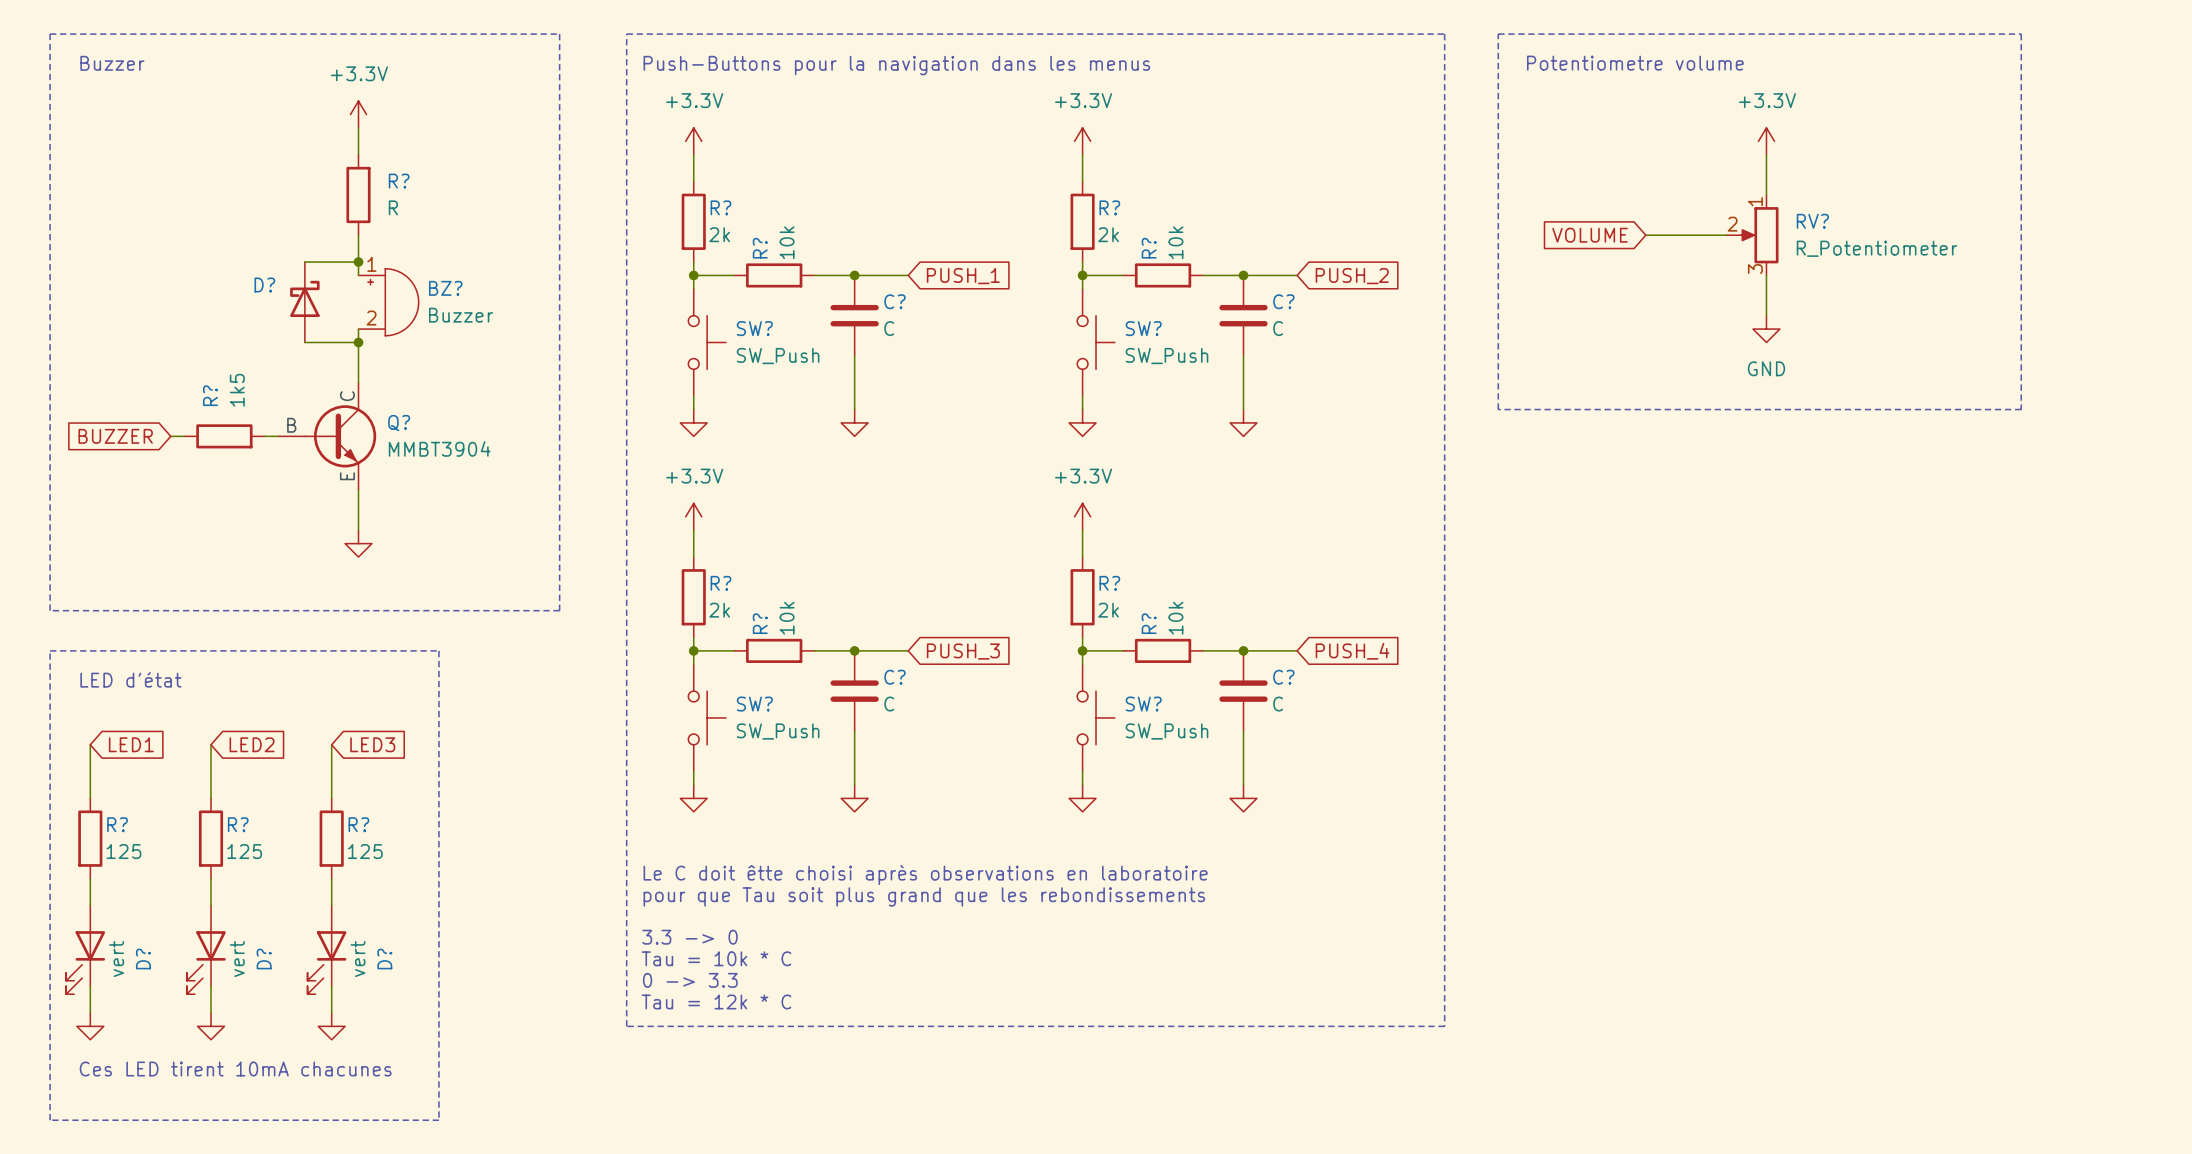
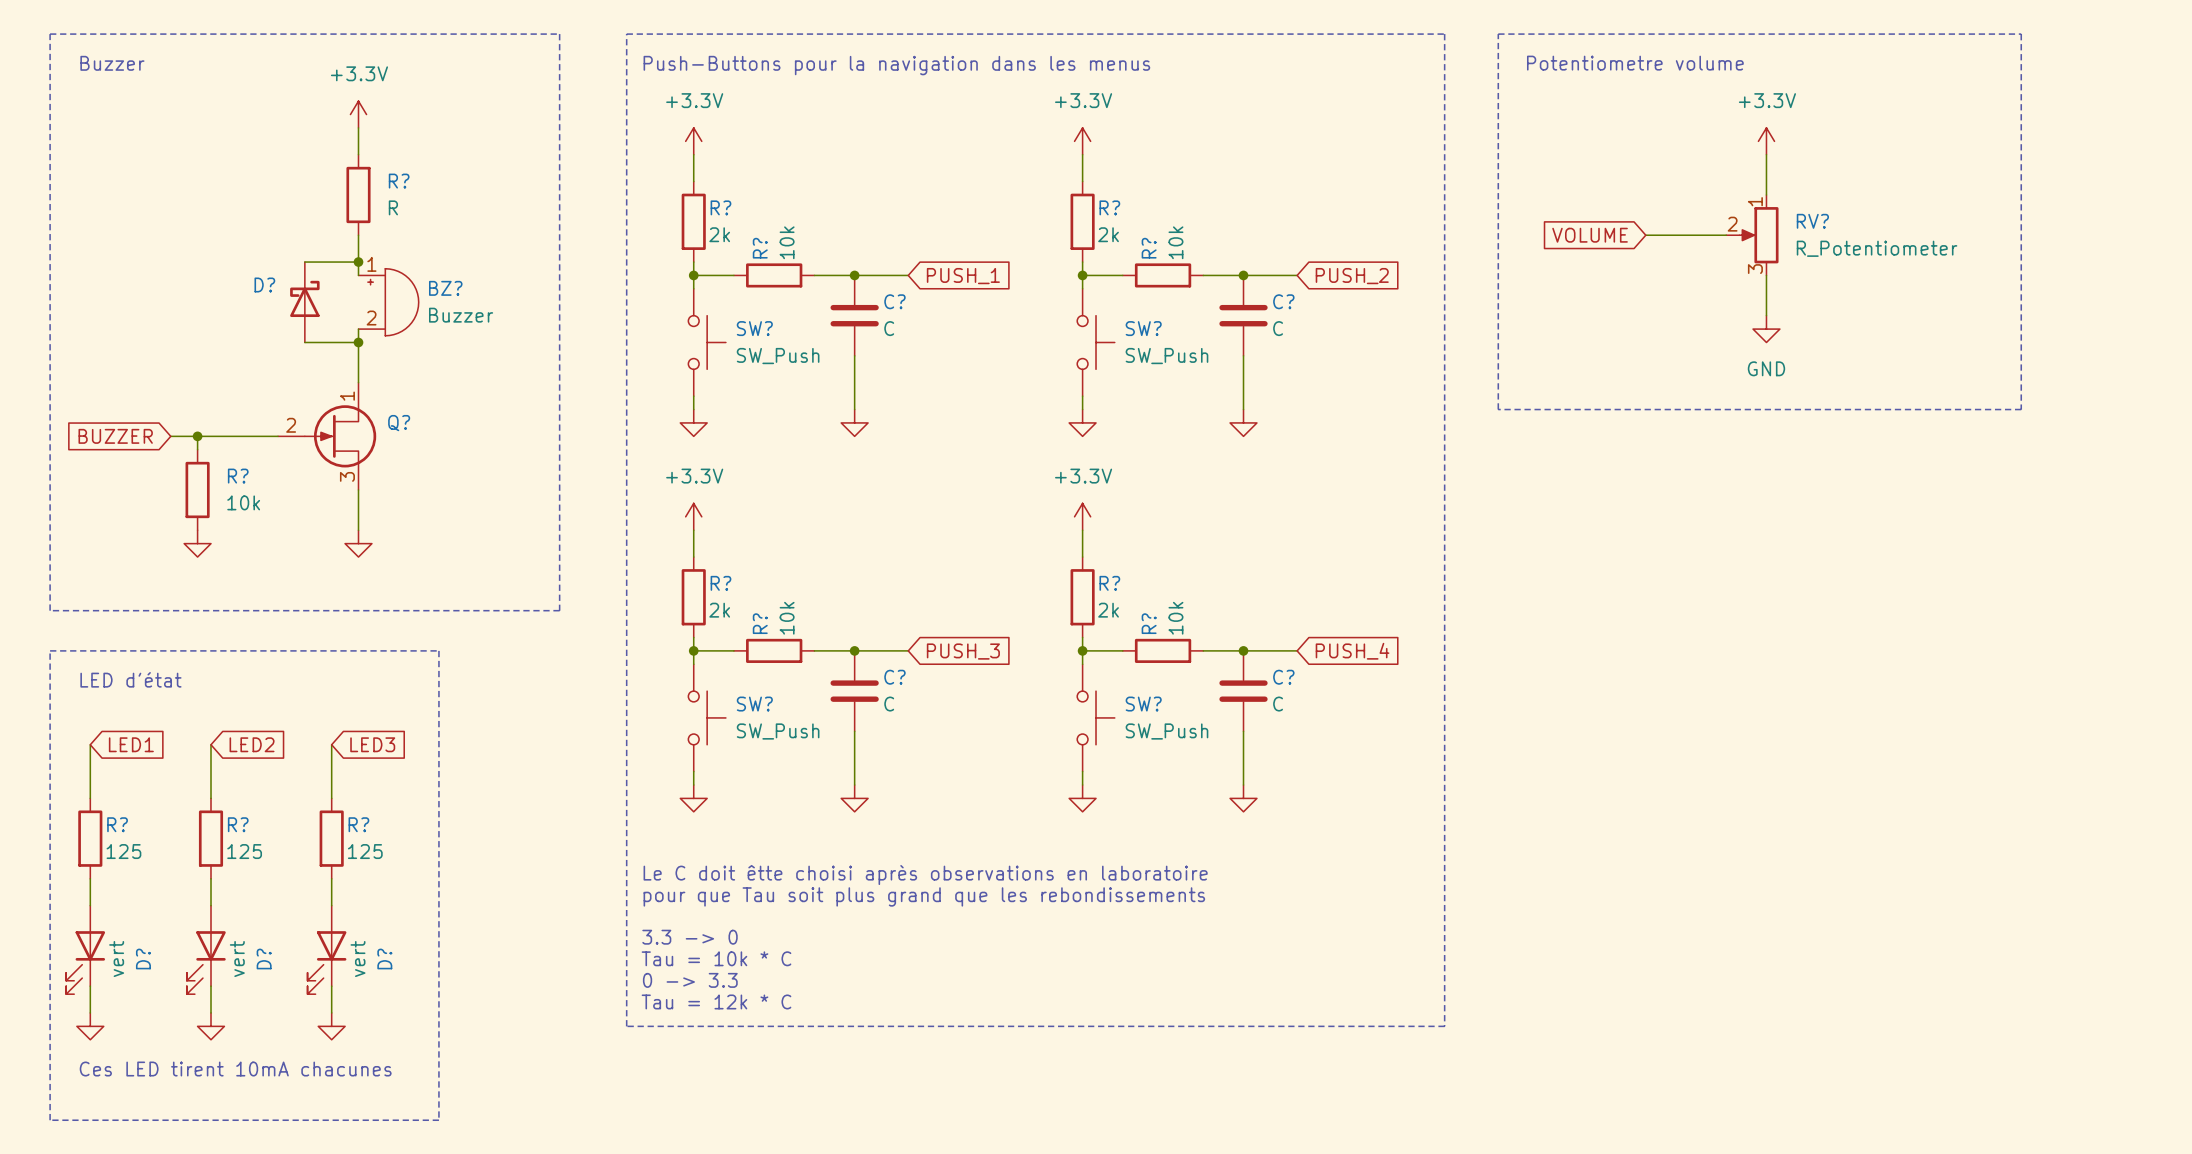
Q? symbol: [278, 382, 377, 490] -> [278, 382, 377, 490]
wire: none -> (184, 436) (264, 436)
junction: none -> (197, 436)
R?: 1k5 (224, 436) -> none
Q? value: MMBT3904 (439, 448) -> none
R?: none -> 10k (197, 489)
power symbol: none -> (197, 543)

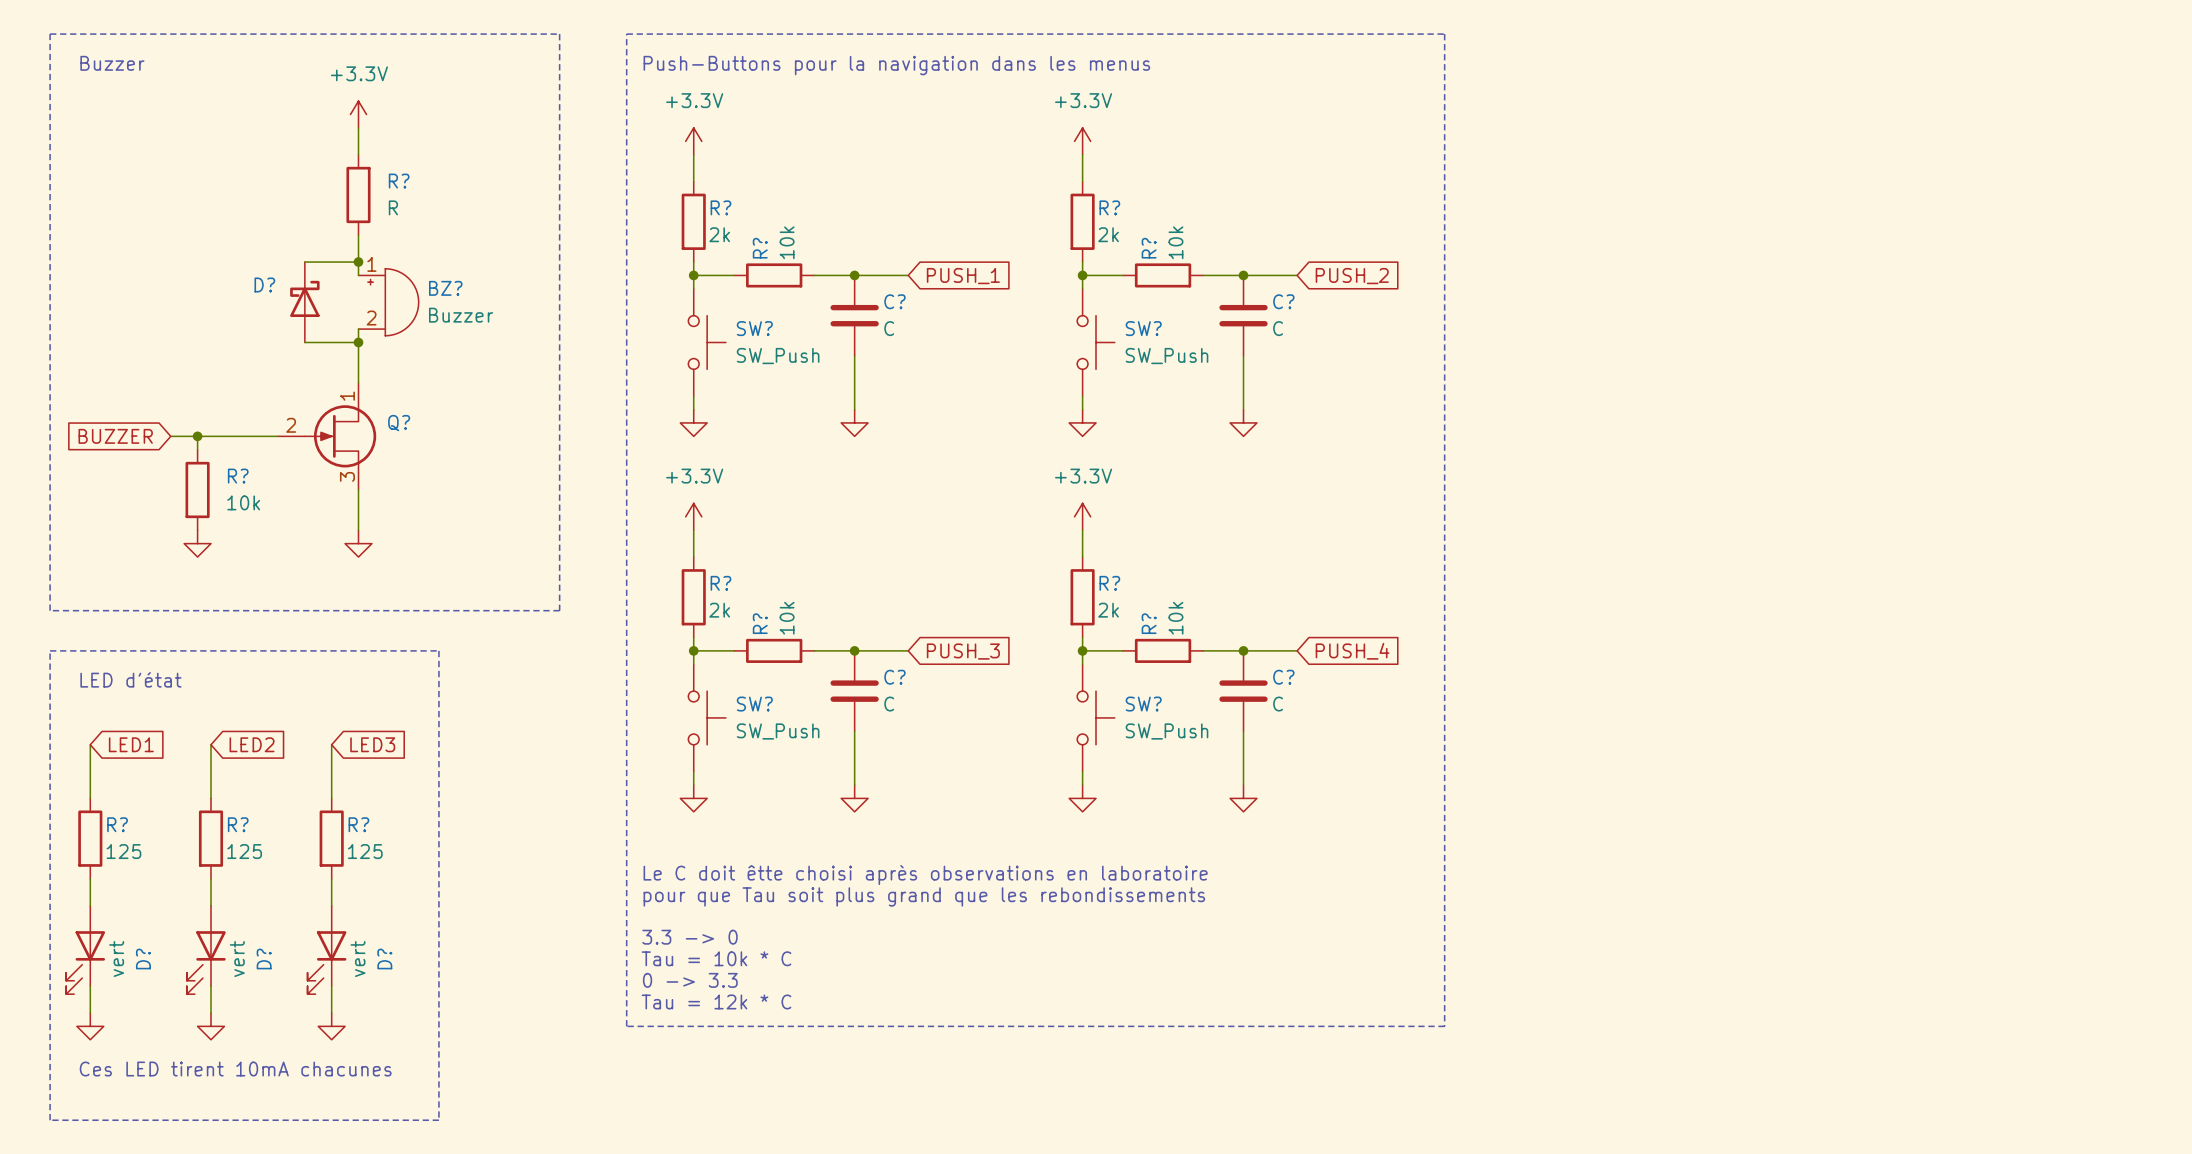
line: (1498, 34) (2021, 34) (2021, 409) (1498, 409) (1498, 34) -> none
text: Potentiometre volume (1635, 63) -> none
power symbol: +3.3V (1766, 141) -> none
wire: (1766, 154) (1766, 194) -> none
global label: VOLUME (1590, 235) -> none
wire: (1645, 235) (1726, 235) -> none
RV?: R_Potentiometer (1752, 235) -> none
wire: (1766, 275) (1766, 315) -> none
power symbol: GND (1766, 329) -> none

